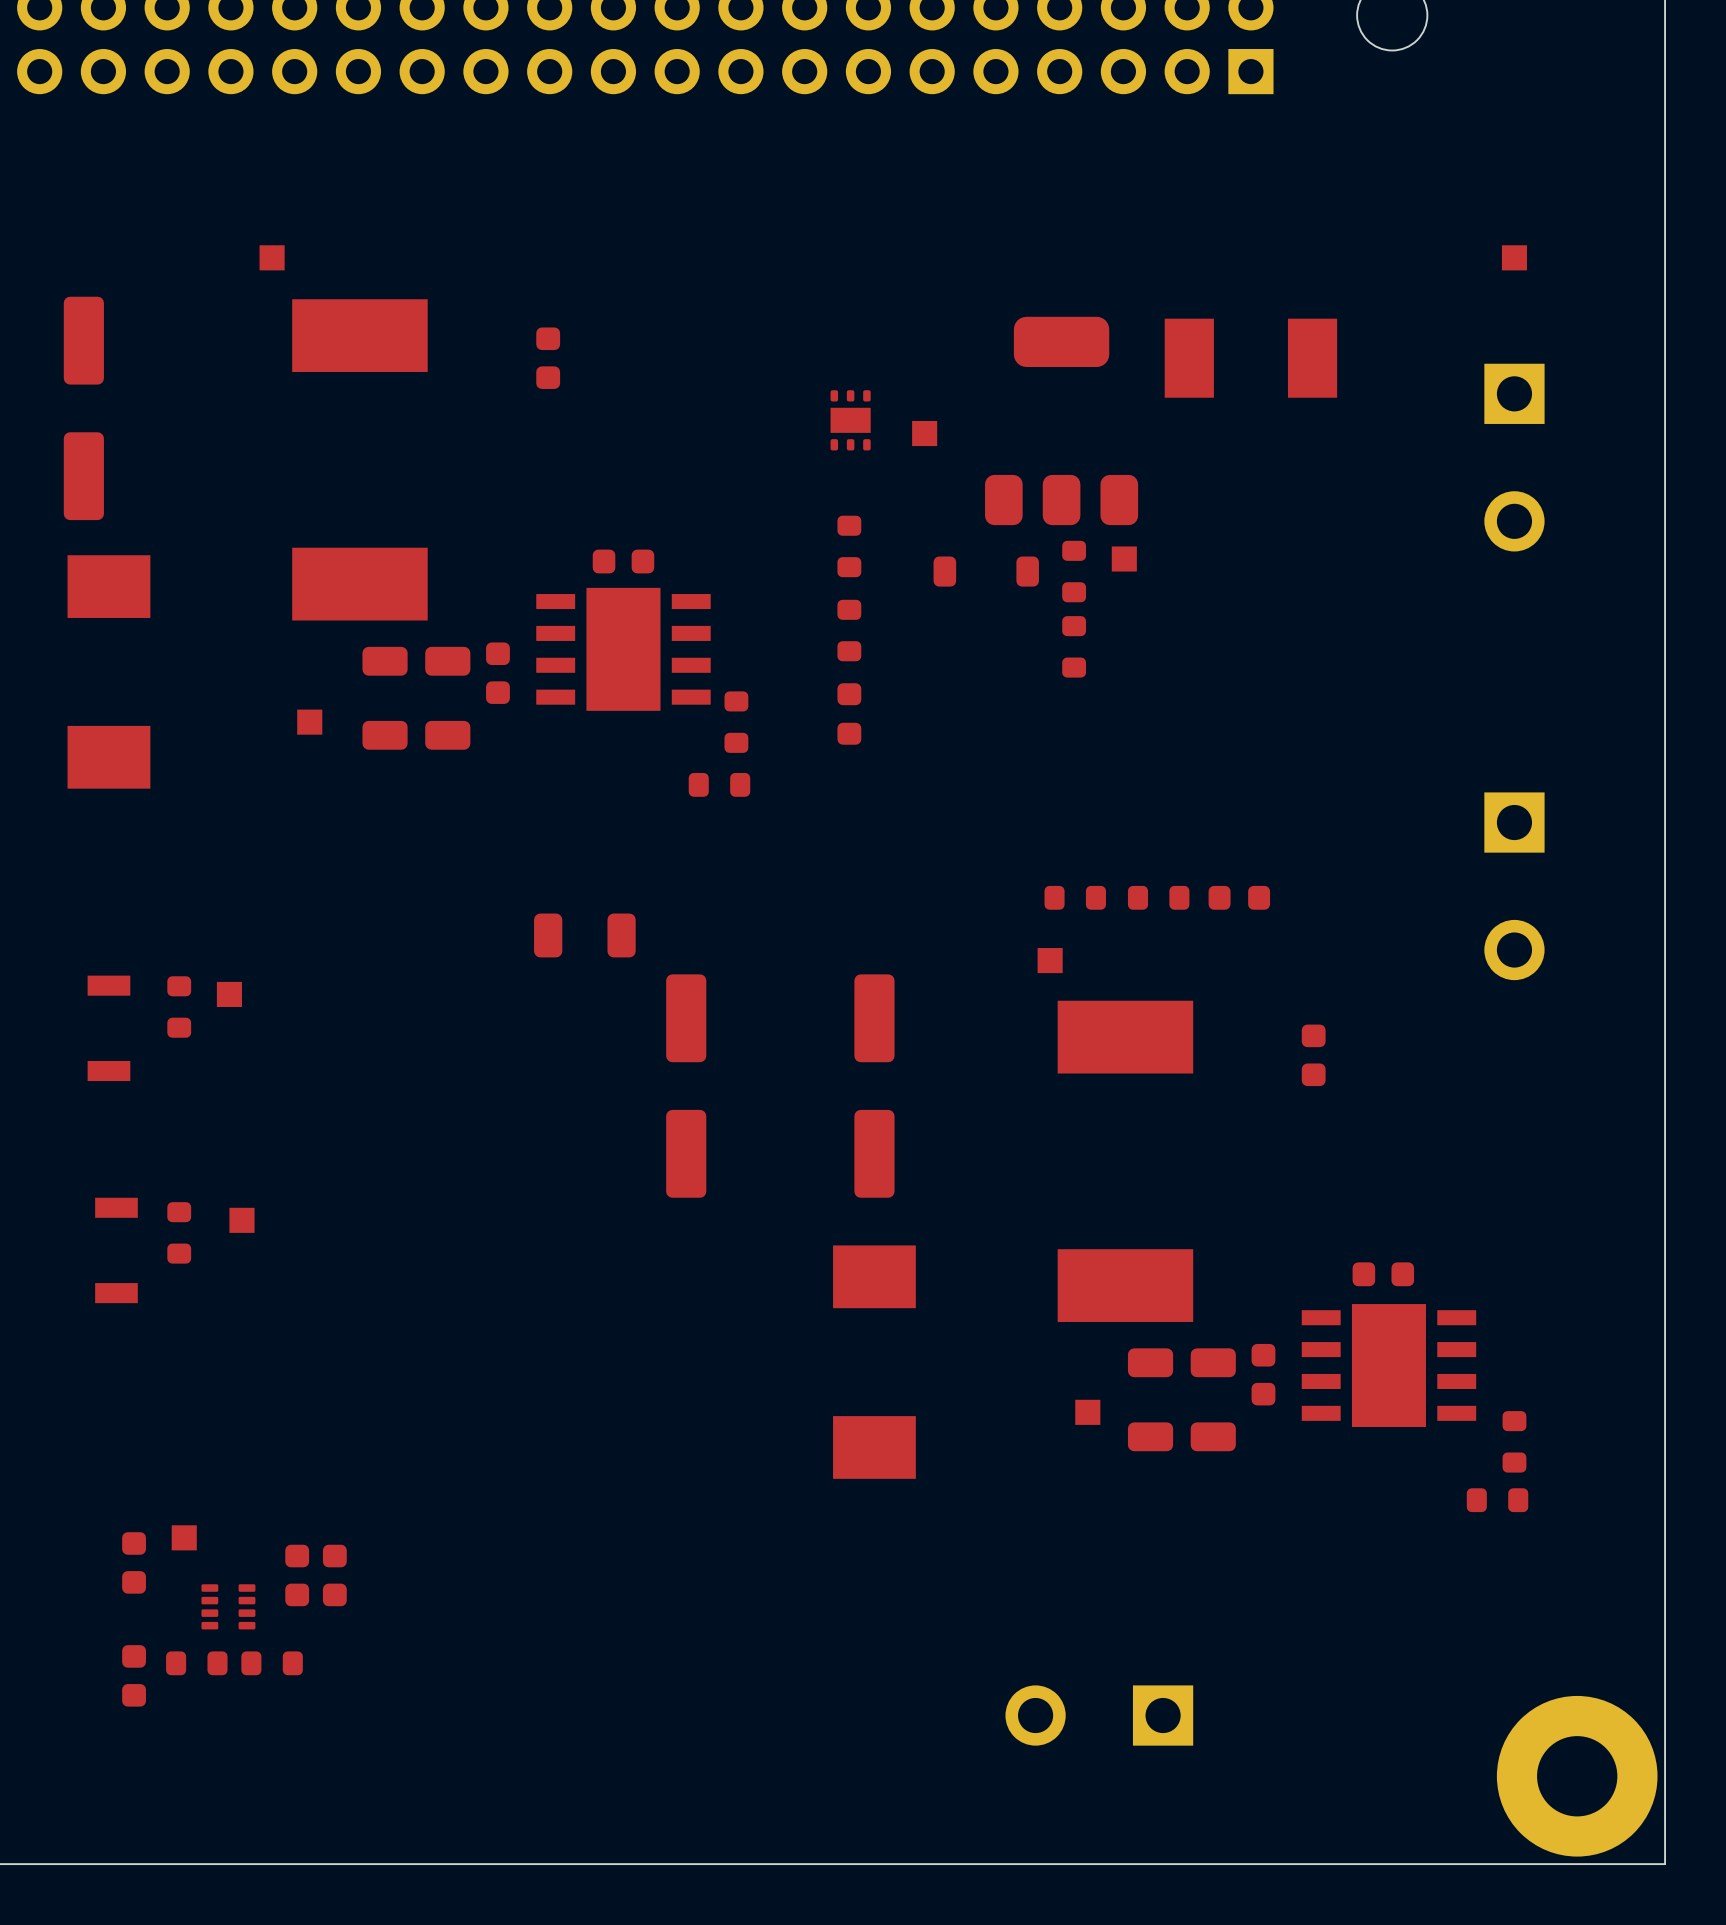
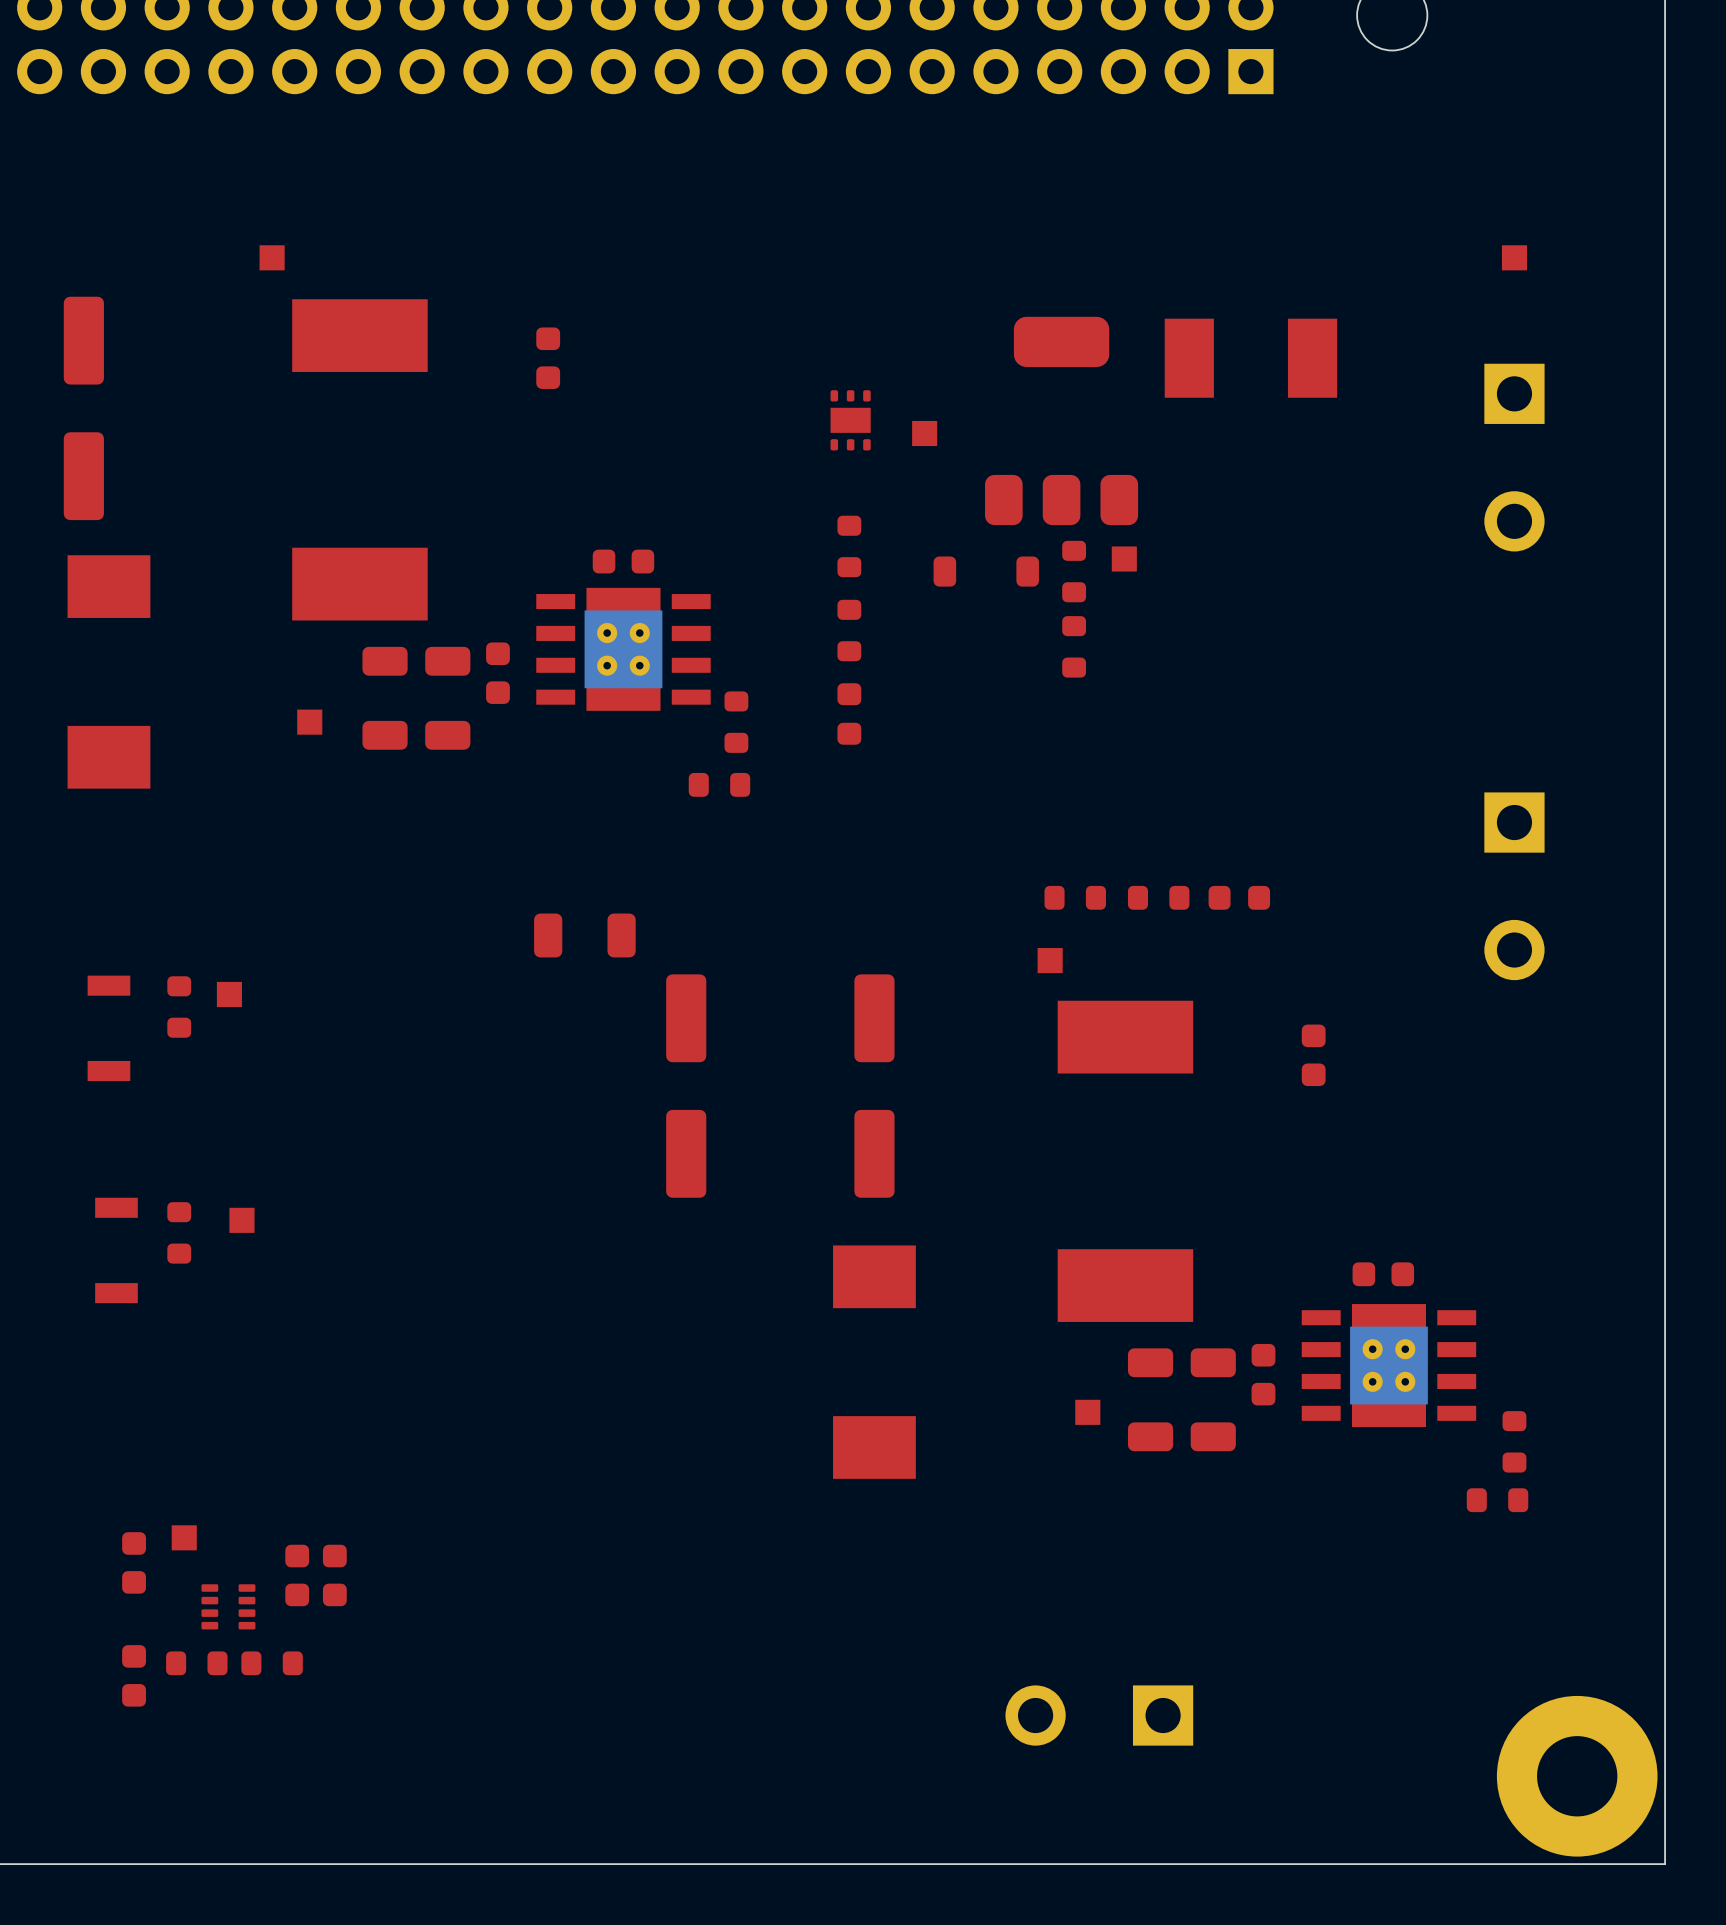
part footprint: [536, 587, 711, 711] -> [536, 587, 711, 711]
part footprint: [1301, 1304, 1477, 1428] -> [1301, 1304, 1477, 1428]

